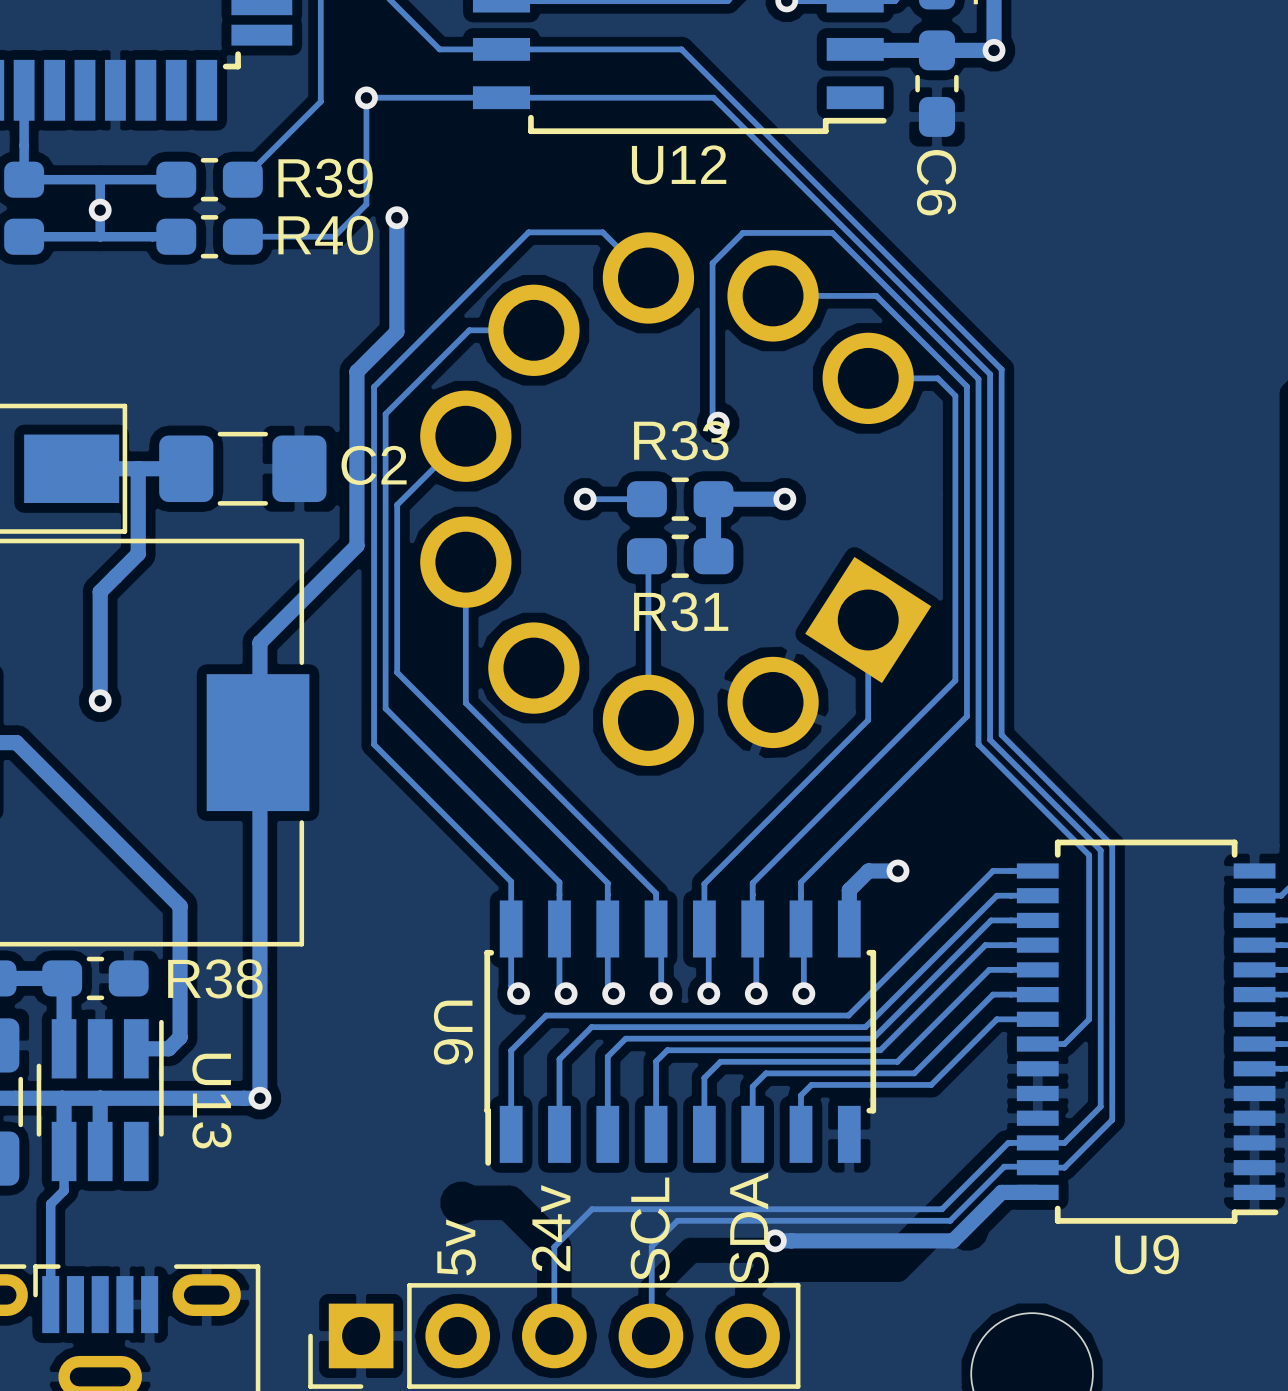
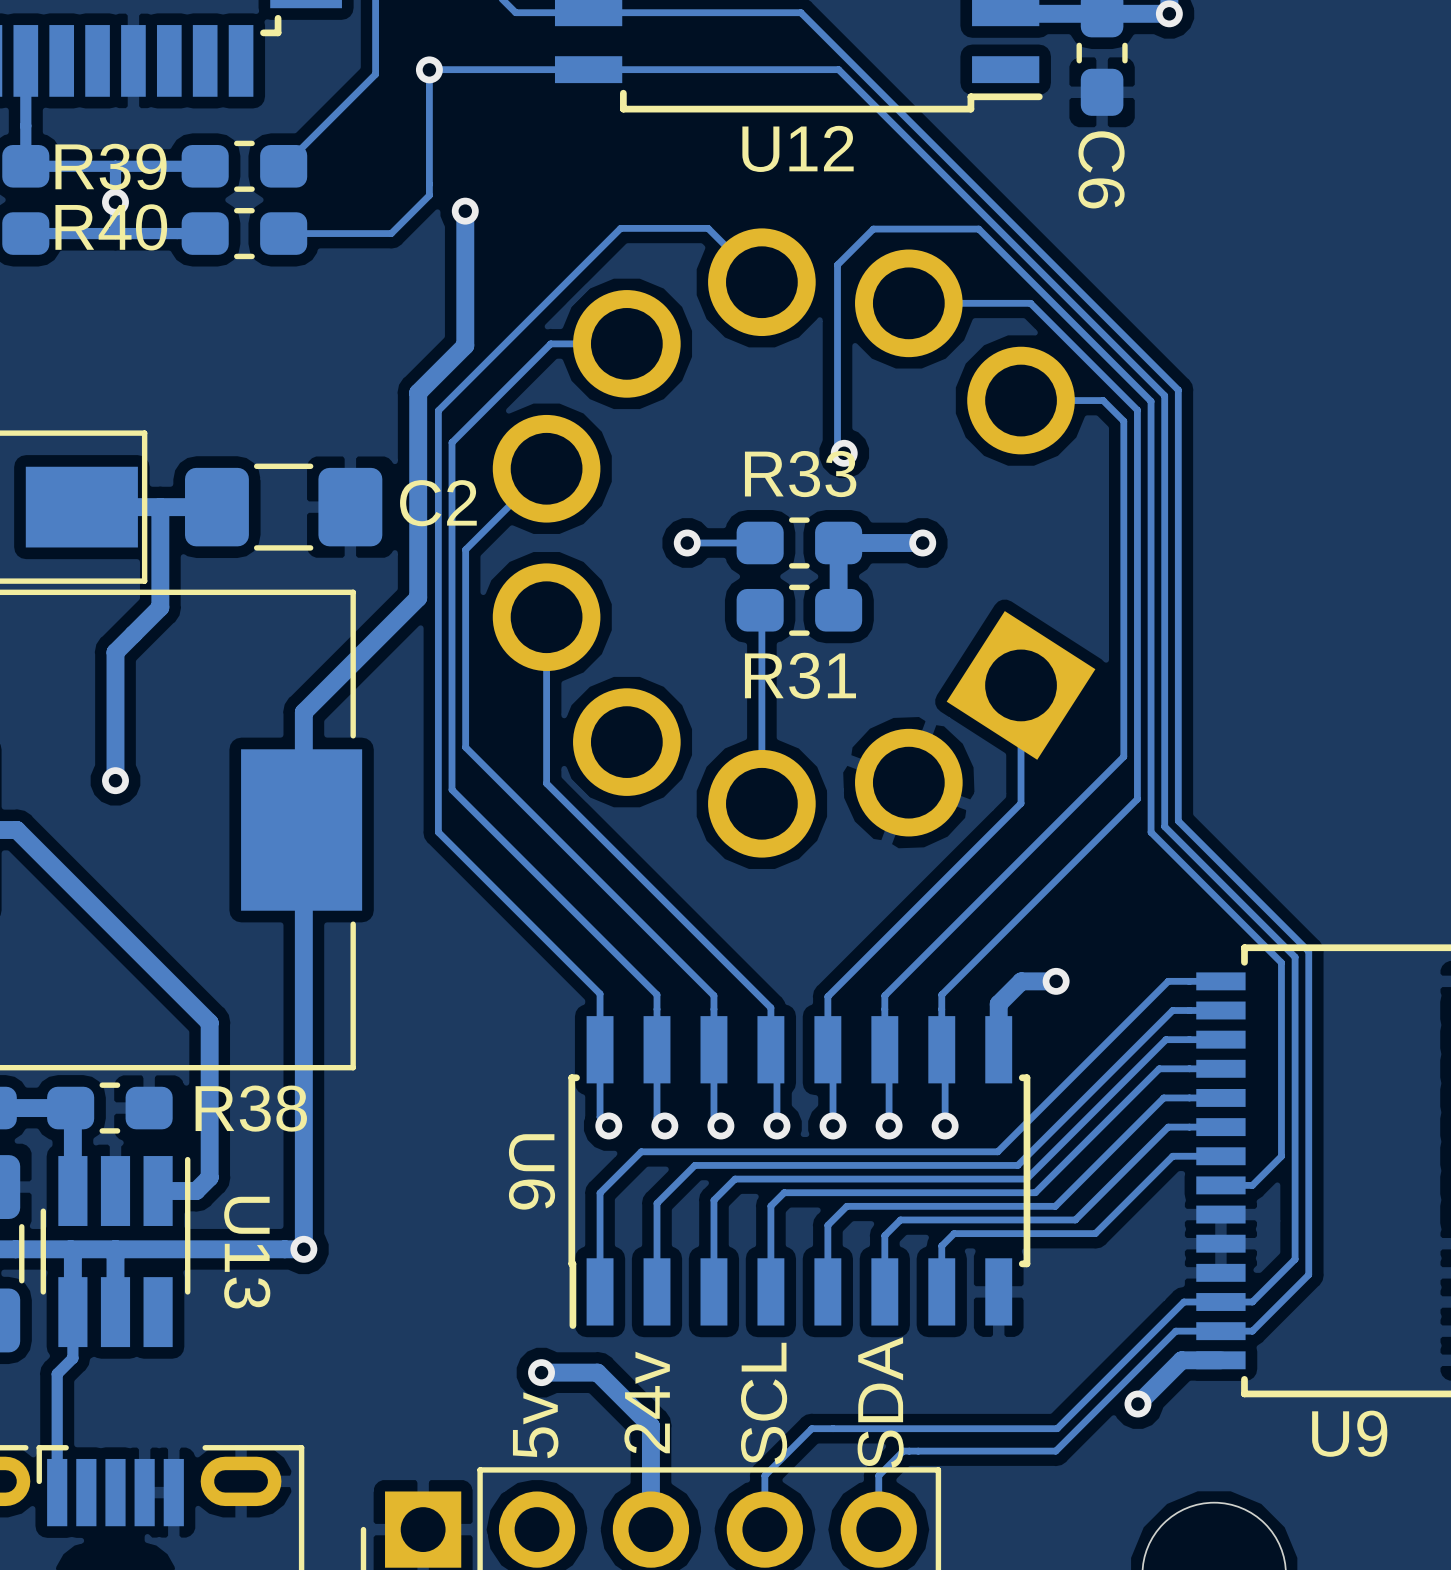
R39 name position: R39 (325, 178) -> R39 (111, 166)
R40 name position: R40 (325, 235) -> R40 (111, 227)
track: (1008, 1142) (942, 1209) (592, 1209) (554, 1248) -> (541, 1372) (597, 1372) (650, 1426)
track: (1037, 1167) (1004, 1166) (950, 1220) (677, 1220) (651, 1246) (650, 1335) -> (1186, 1302) (1183, 1302) (1057, 1428) (811, 1428) (764, 1475) (764, 1529)
track: none -> (1220, 1331) (1175, 1331) (1055, 1451) (903, 1451) (878, 1475) (878, 1529)
track: (1004, 1192) (1001, 1192) (953, 1240) (775, 1240) -> (1181, 1360) (1137, 1404)
via: none -> (541, 1372)
via: none -> (1137, 1404)
via: (775, 1240) -> none
track width: thin (554, 1248) (554, 1335) -> thick (650, 1426) (650, 1529)

